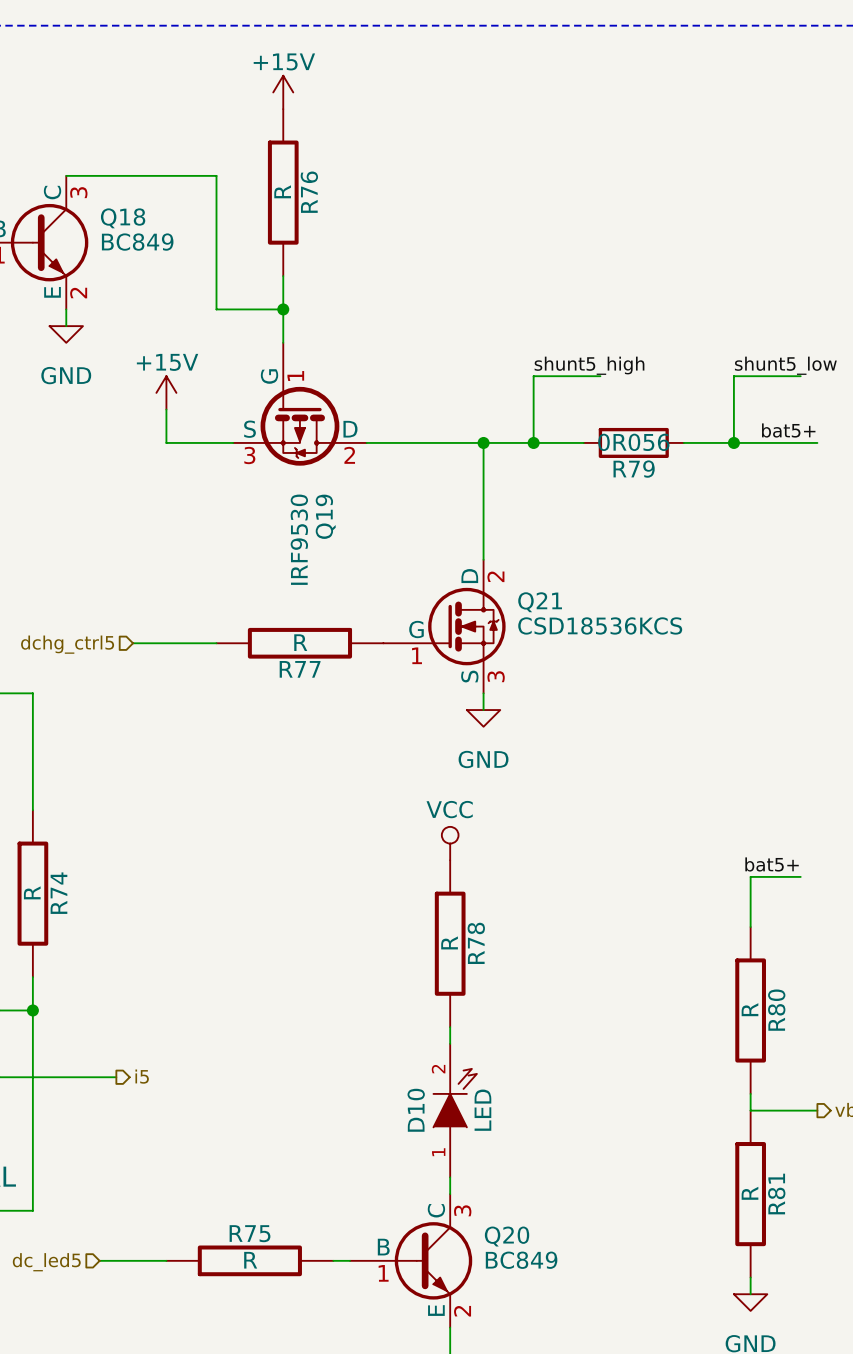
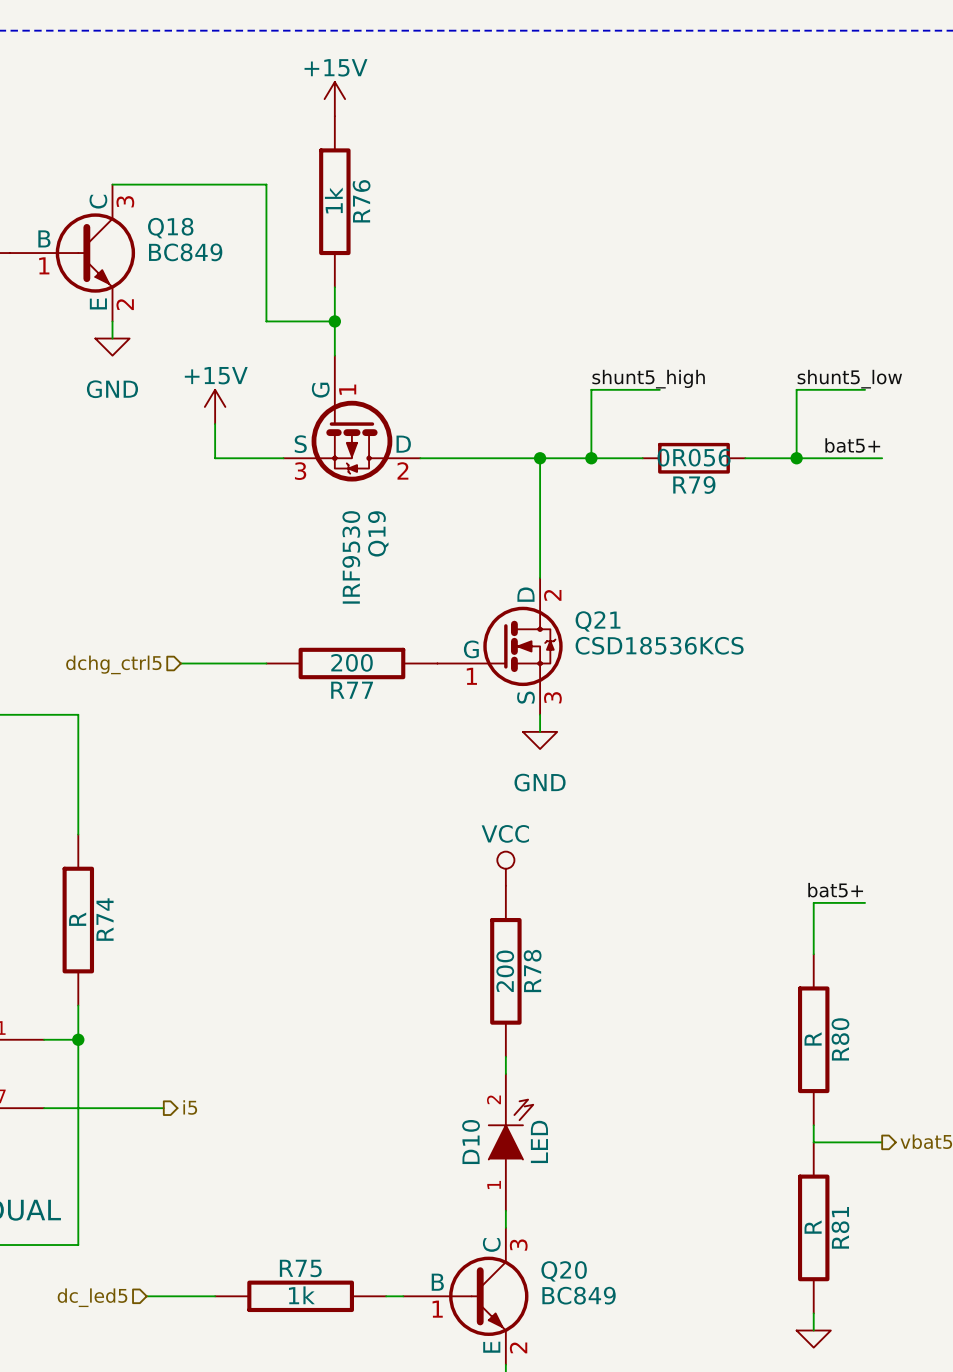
R76 value: R (282, 191) -> 1k (333, 200)
R77 value: R (300, 642) -> 200 (352, 662)
R78 value: R (449, 942) -> 200 (505, 971)
R75 value: R (250, 1260) -> 1k (301, 1295)

